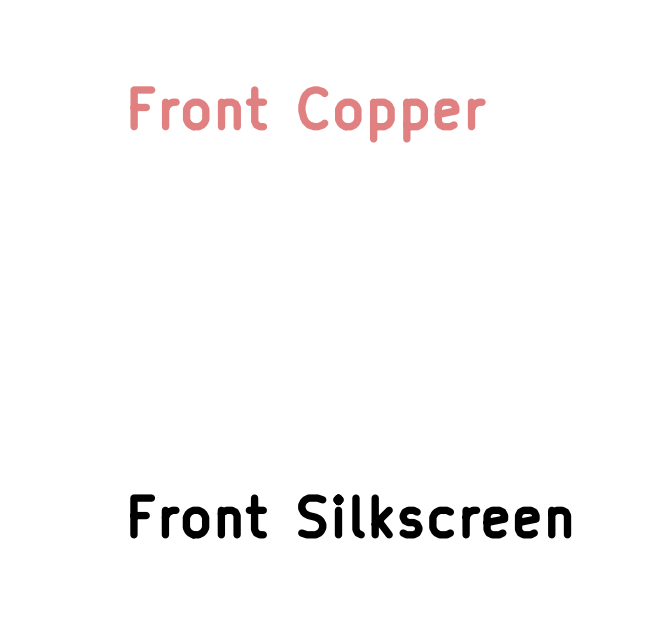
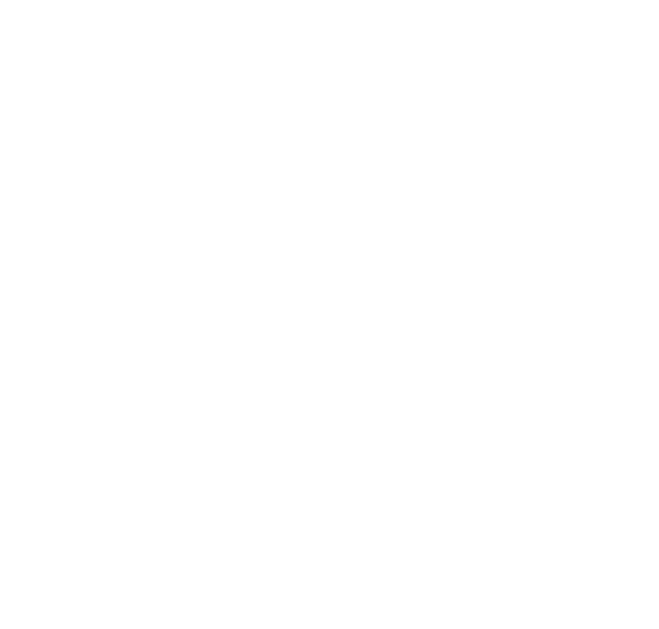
text: Front Copper (308, 114) -> none
text: Front Silkscreen (350, 516) -> none

